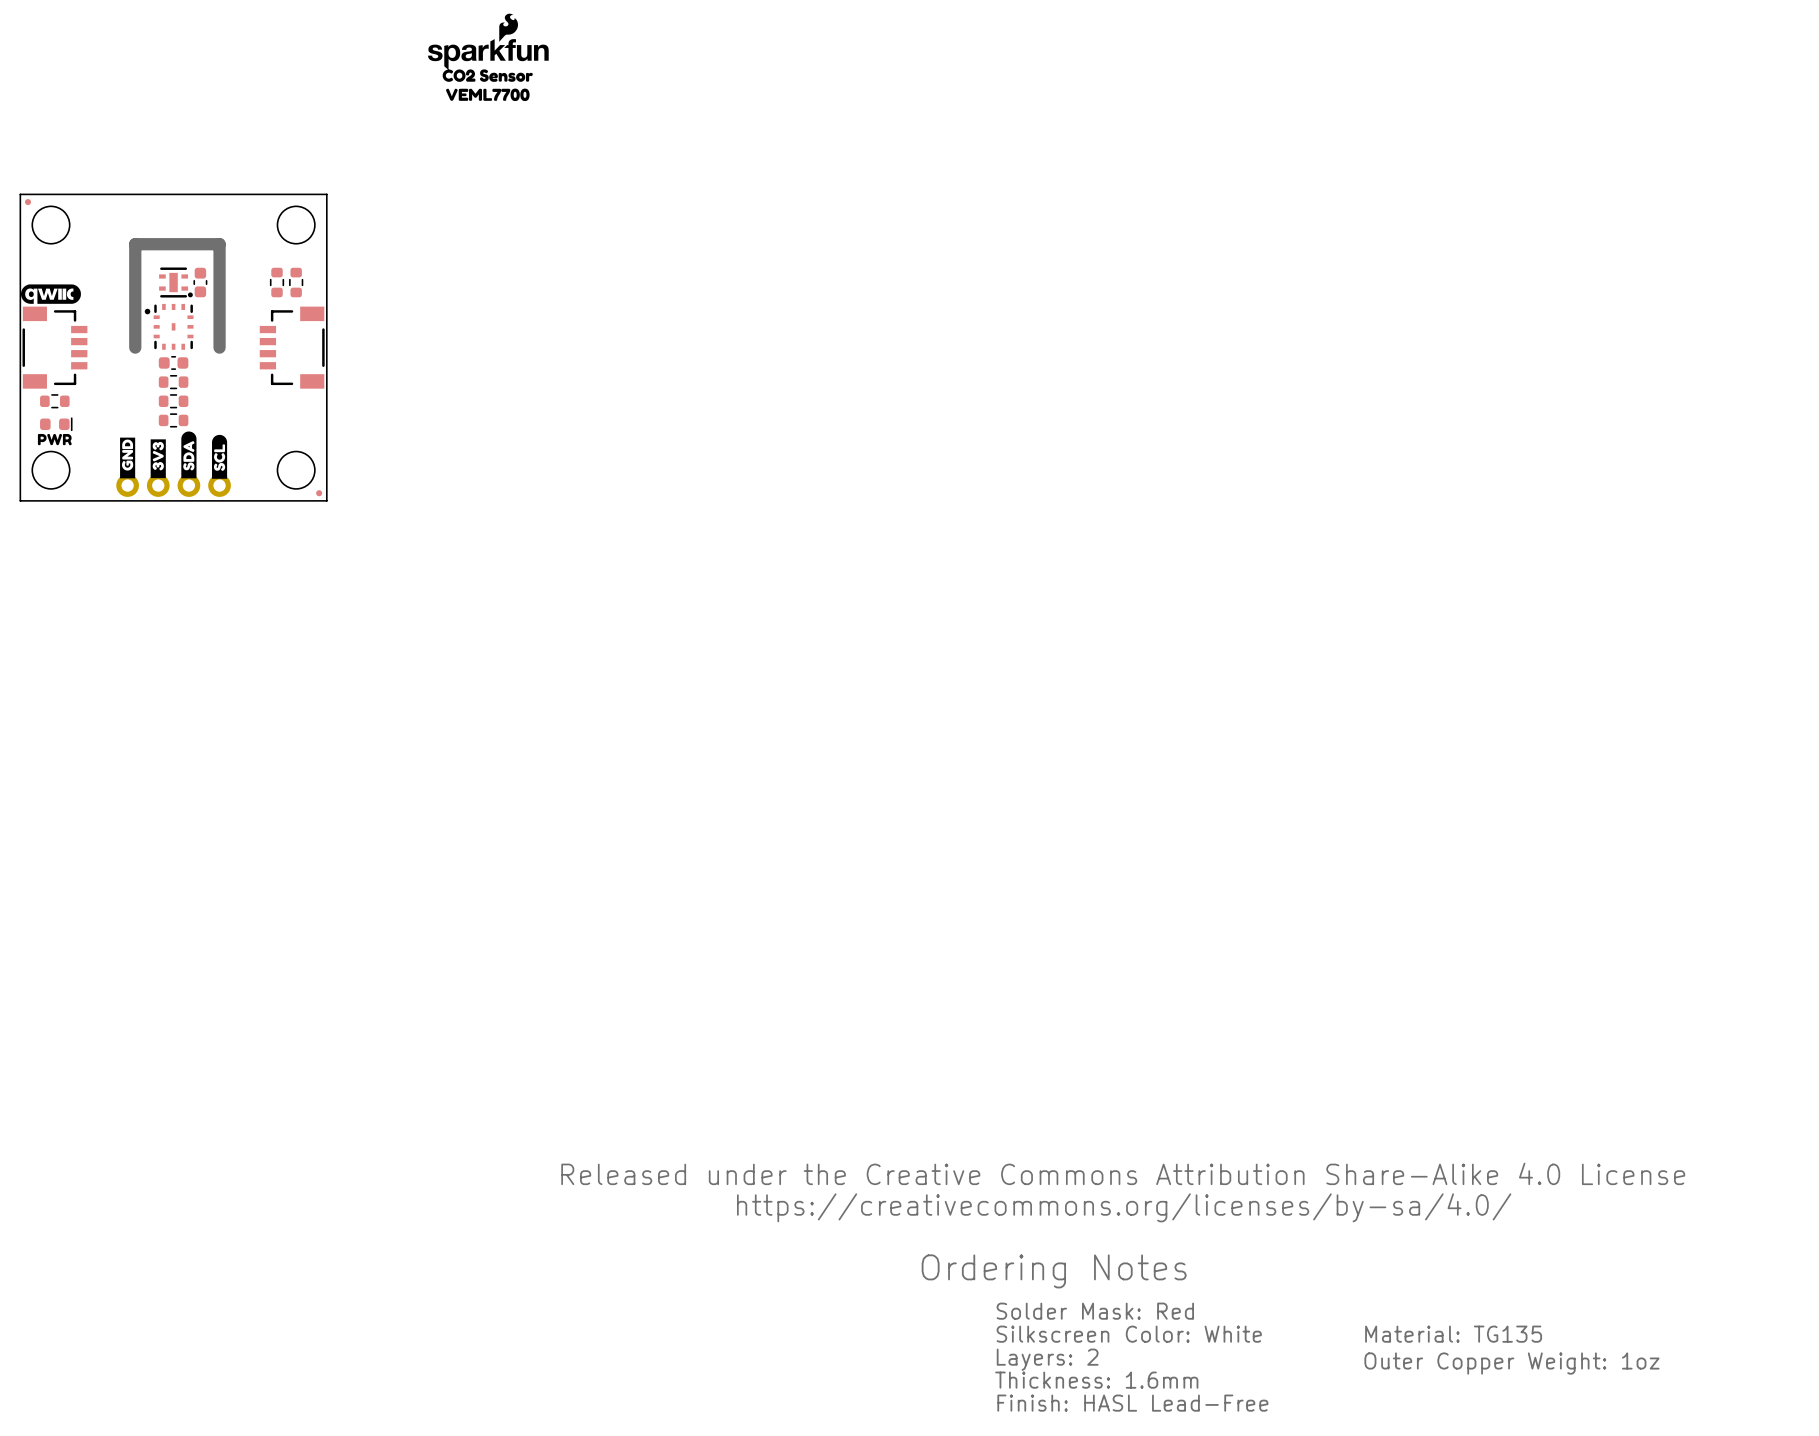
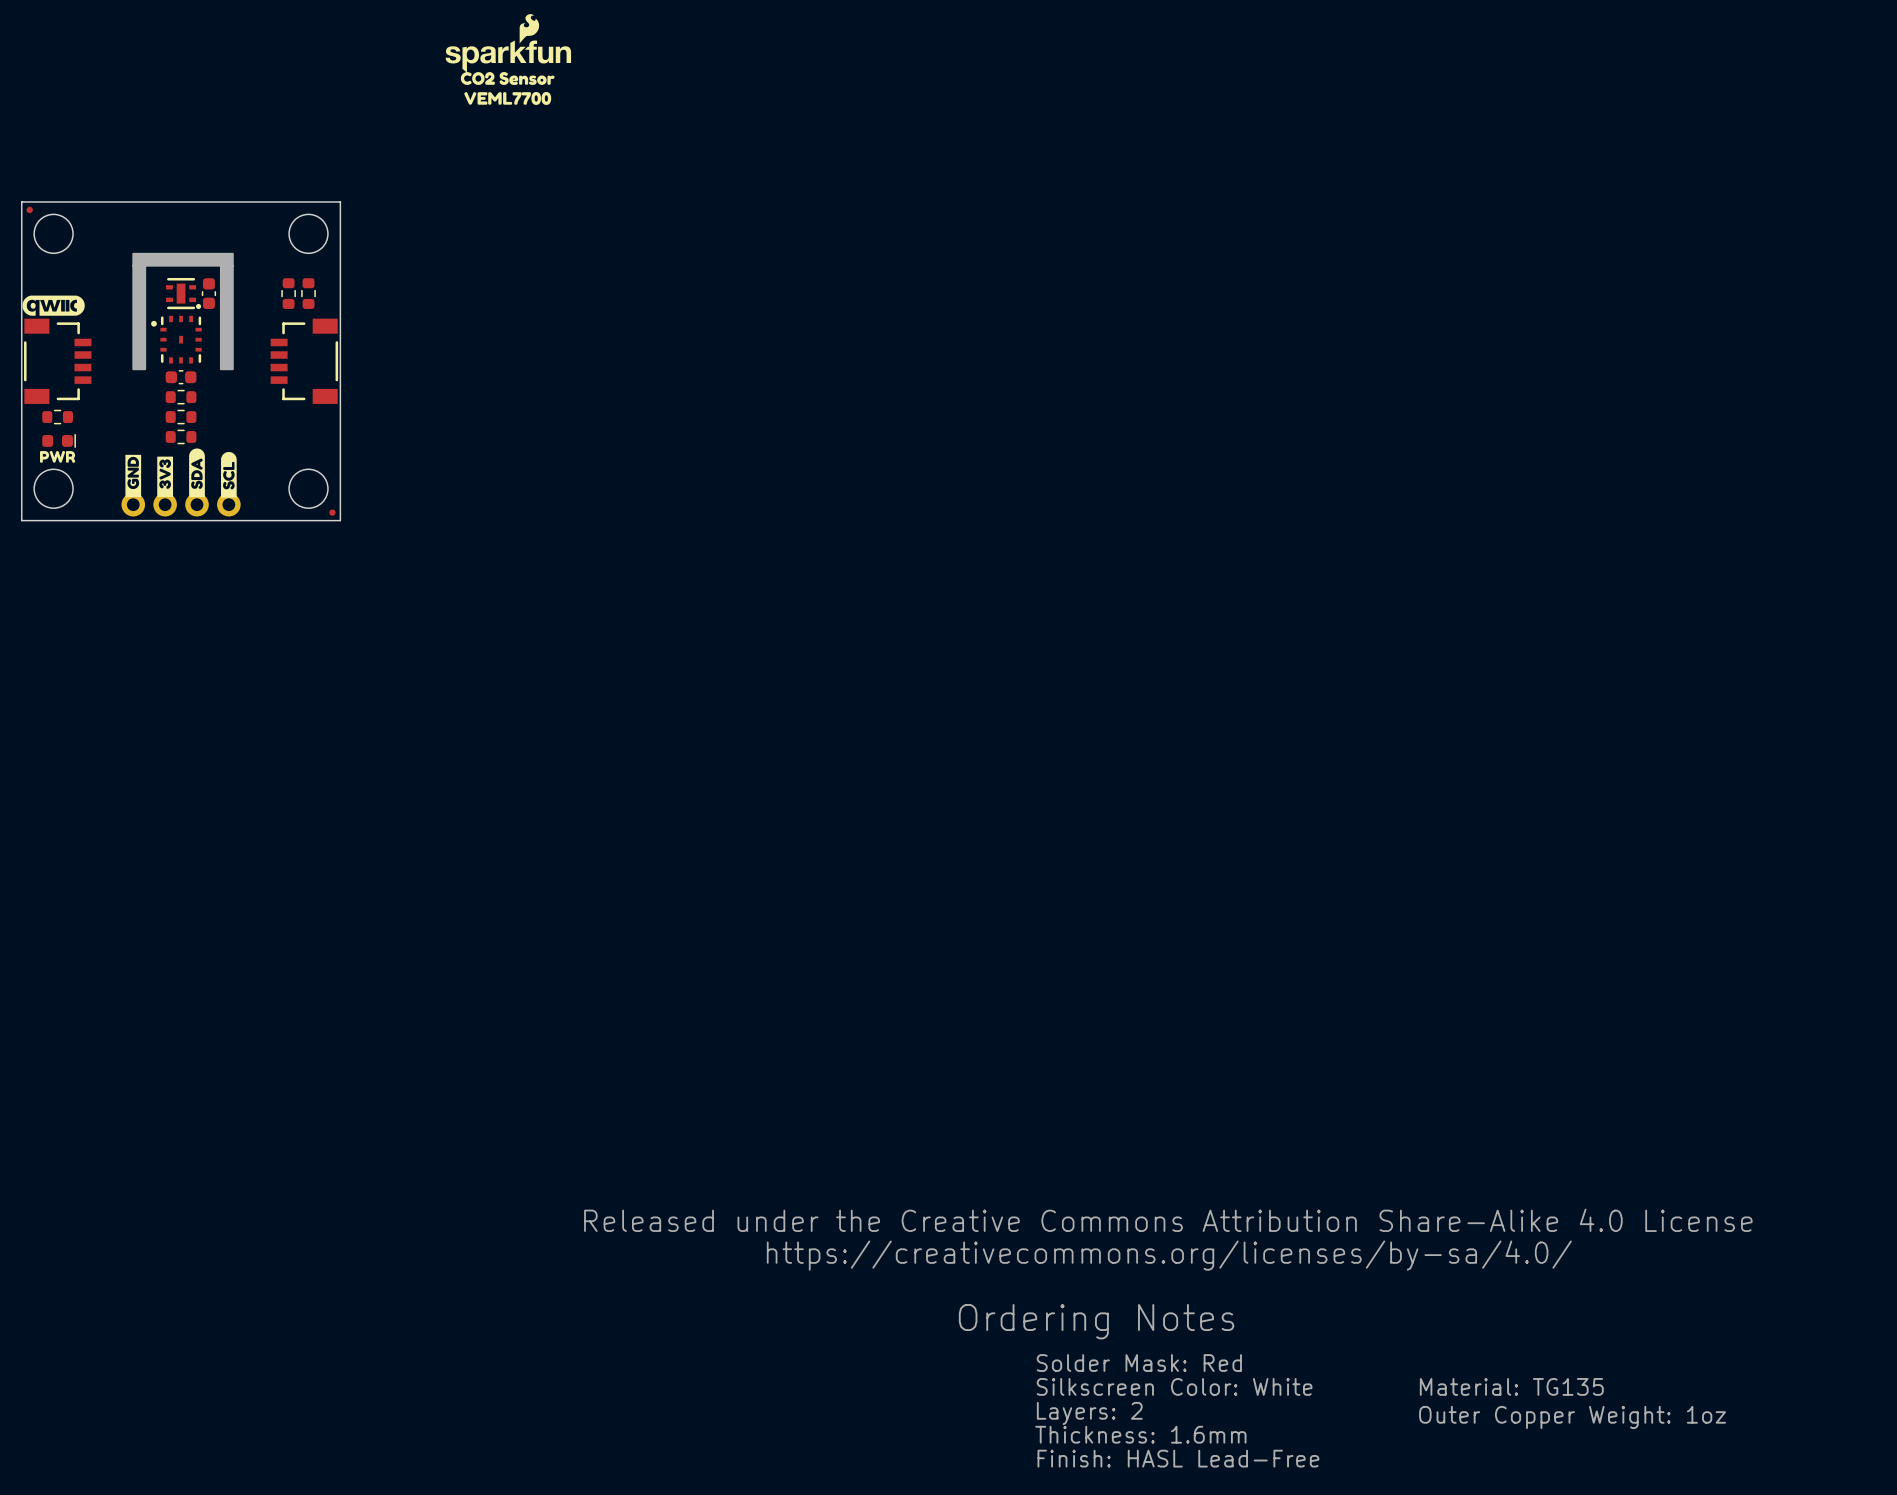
drawing: none -> [132, 252, 234, 371]
line: (135, 347) (135, 244) (219, 244) (219, 347) -> none

